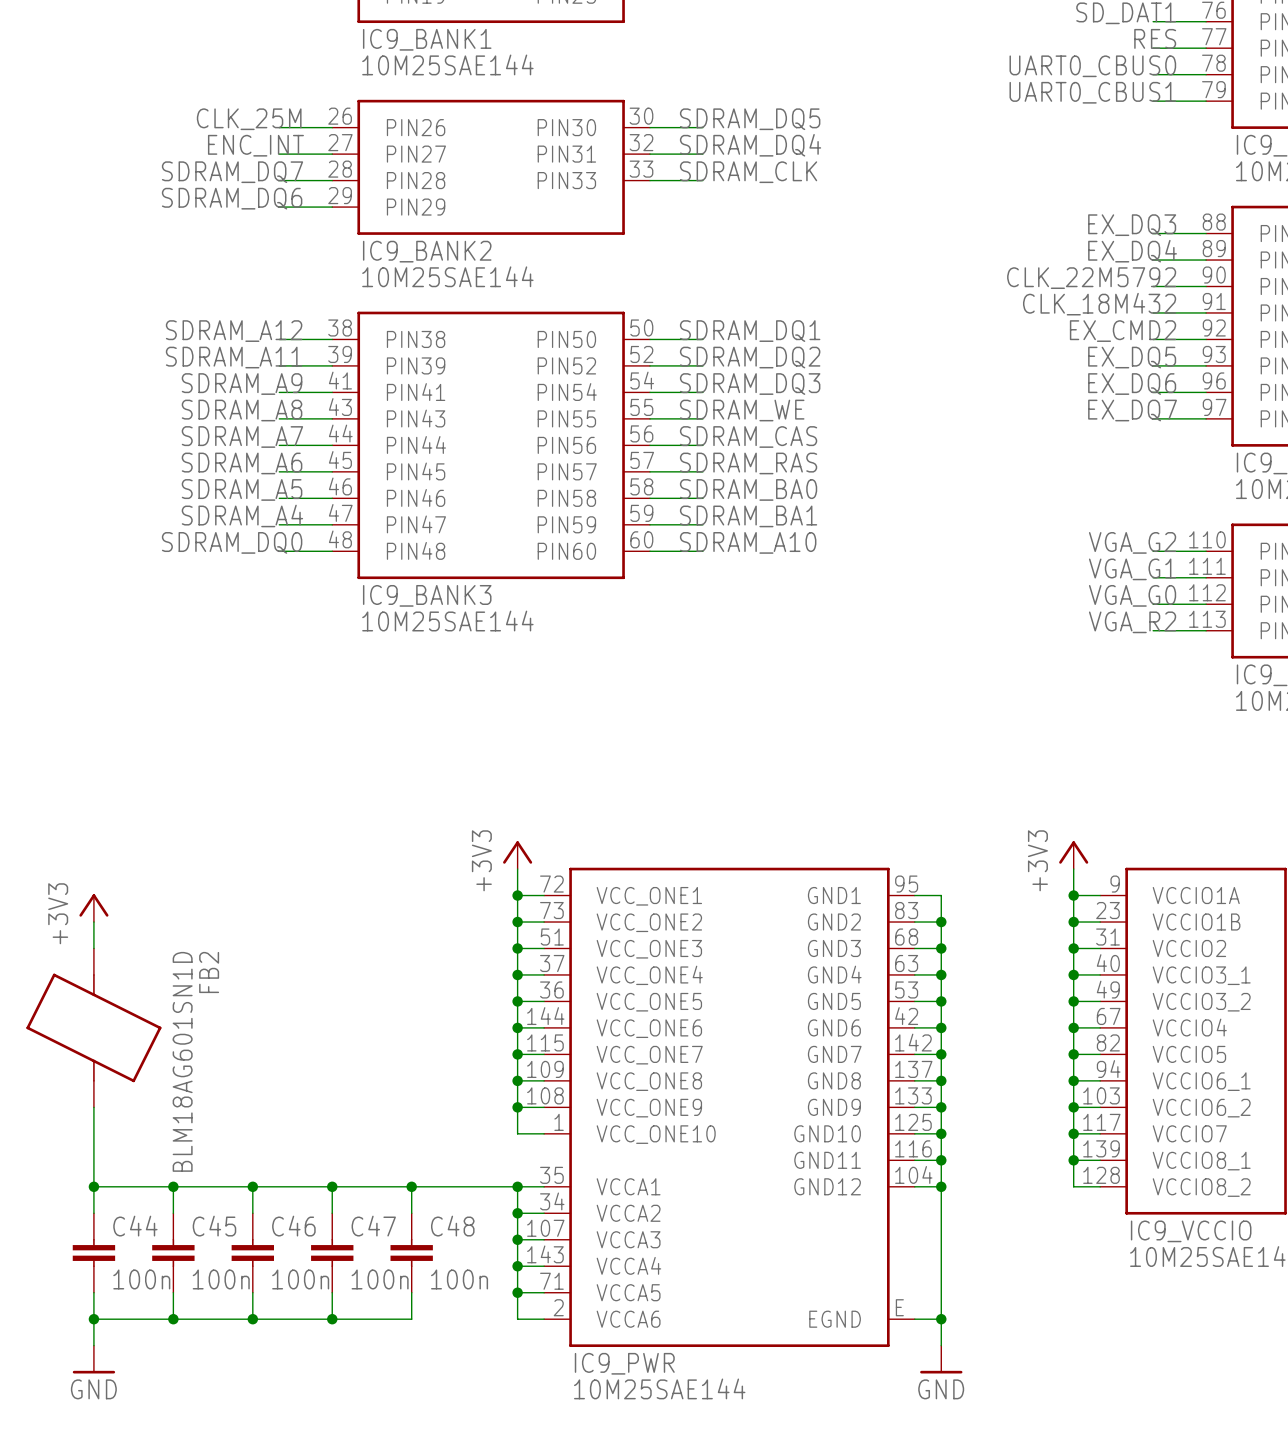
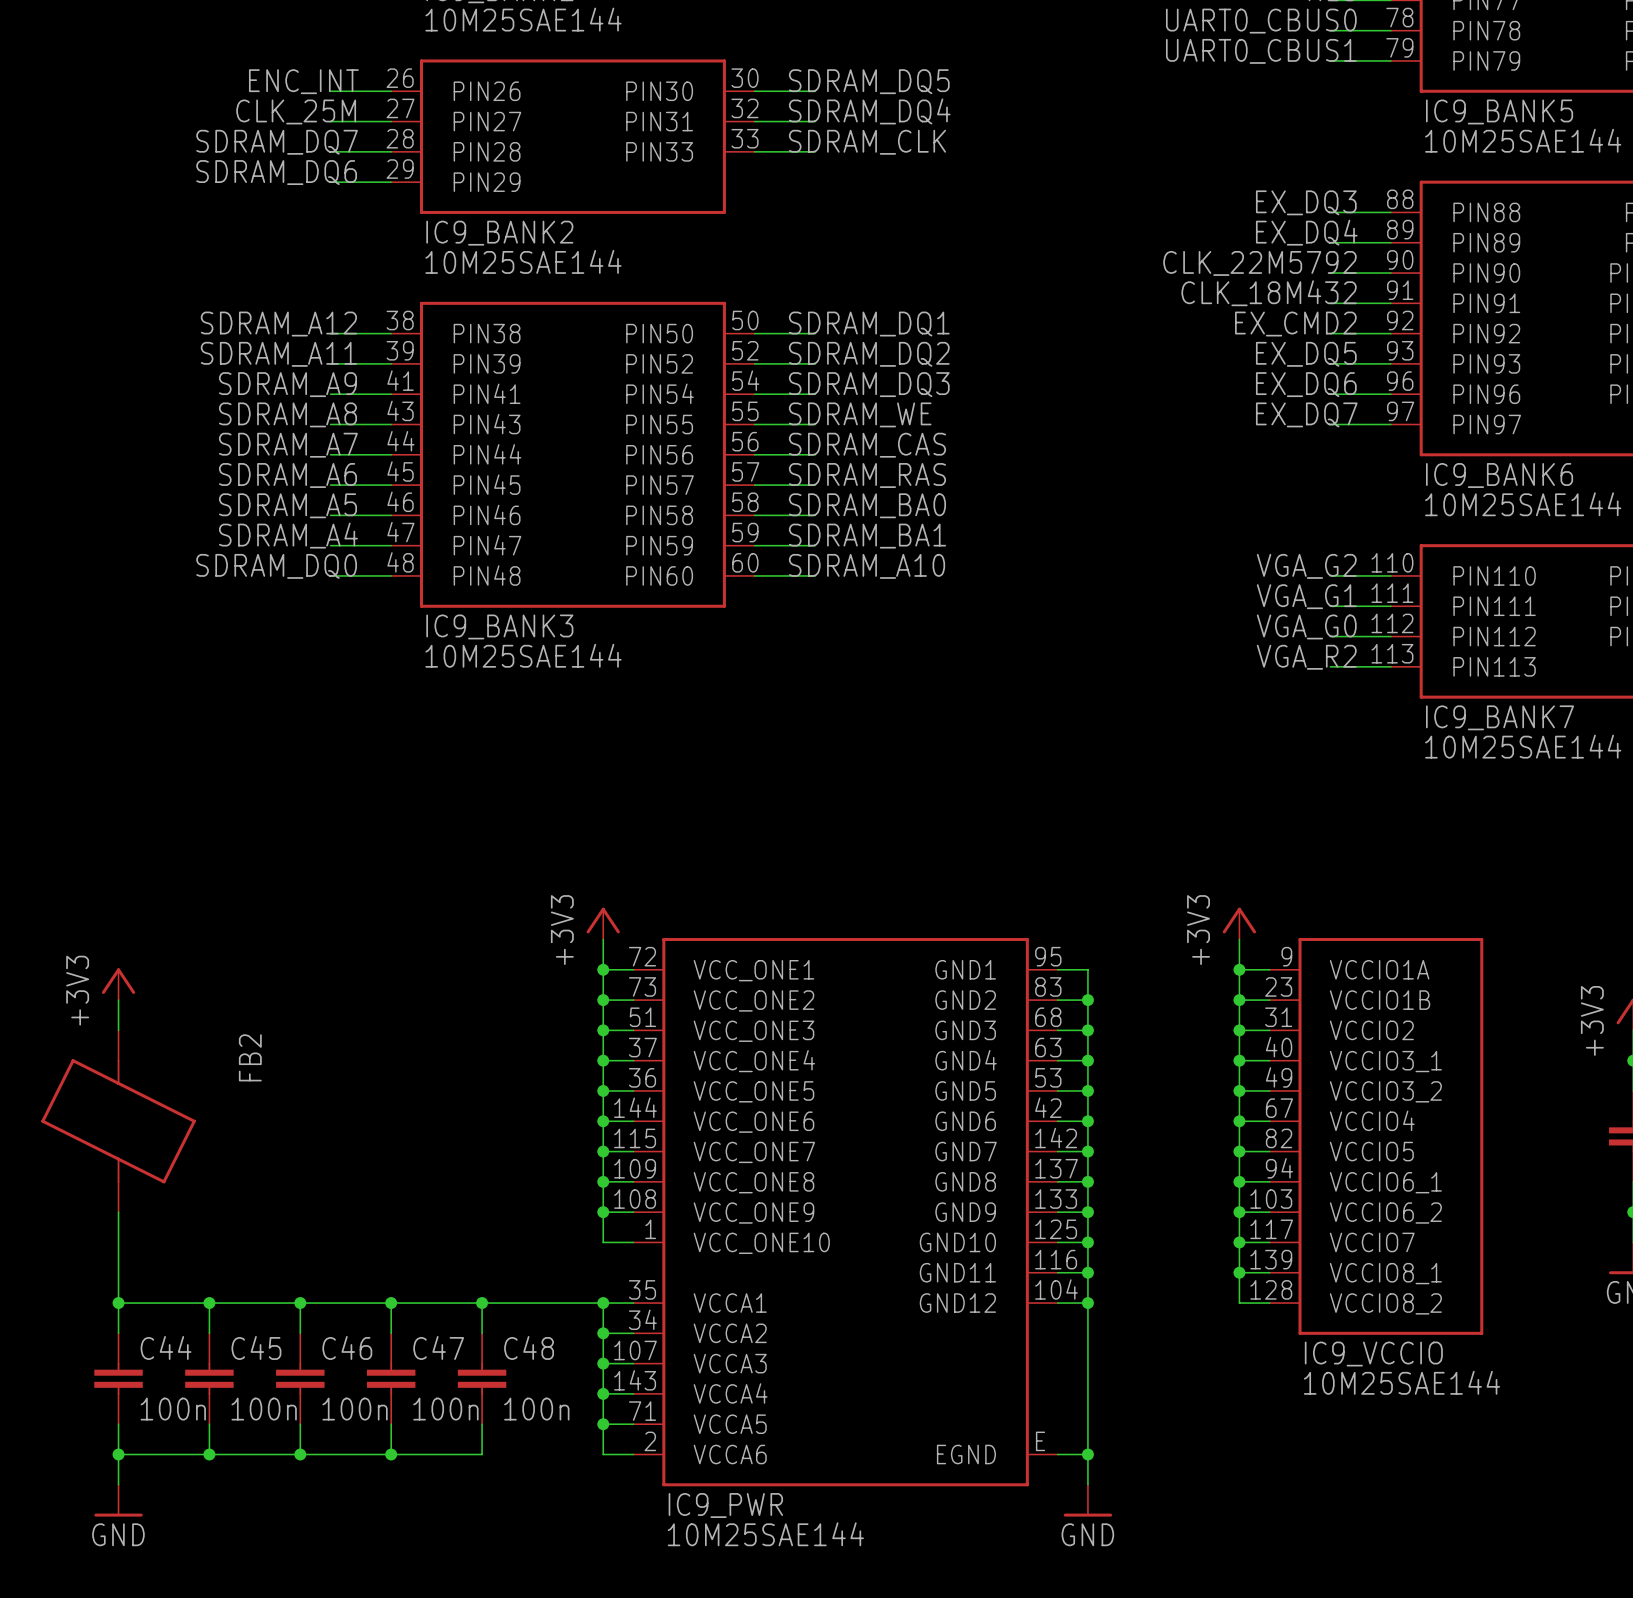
label: CLK_25M (249, 119) -> ENC_INT (303, 81)
label: ENC_INT (255, 145) -> CLK_25M (296, 111)
FB2 value: BLM18AG601SN1D (182, 1061) -> none

